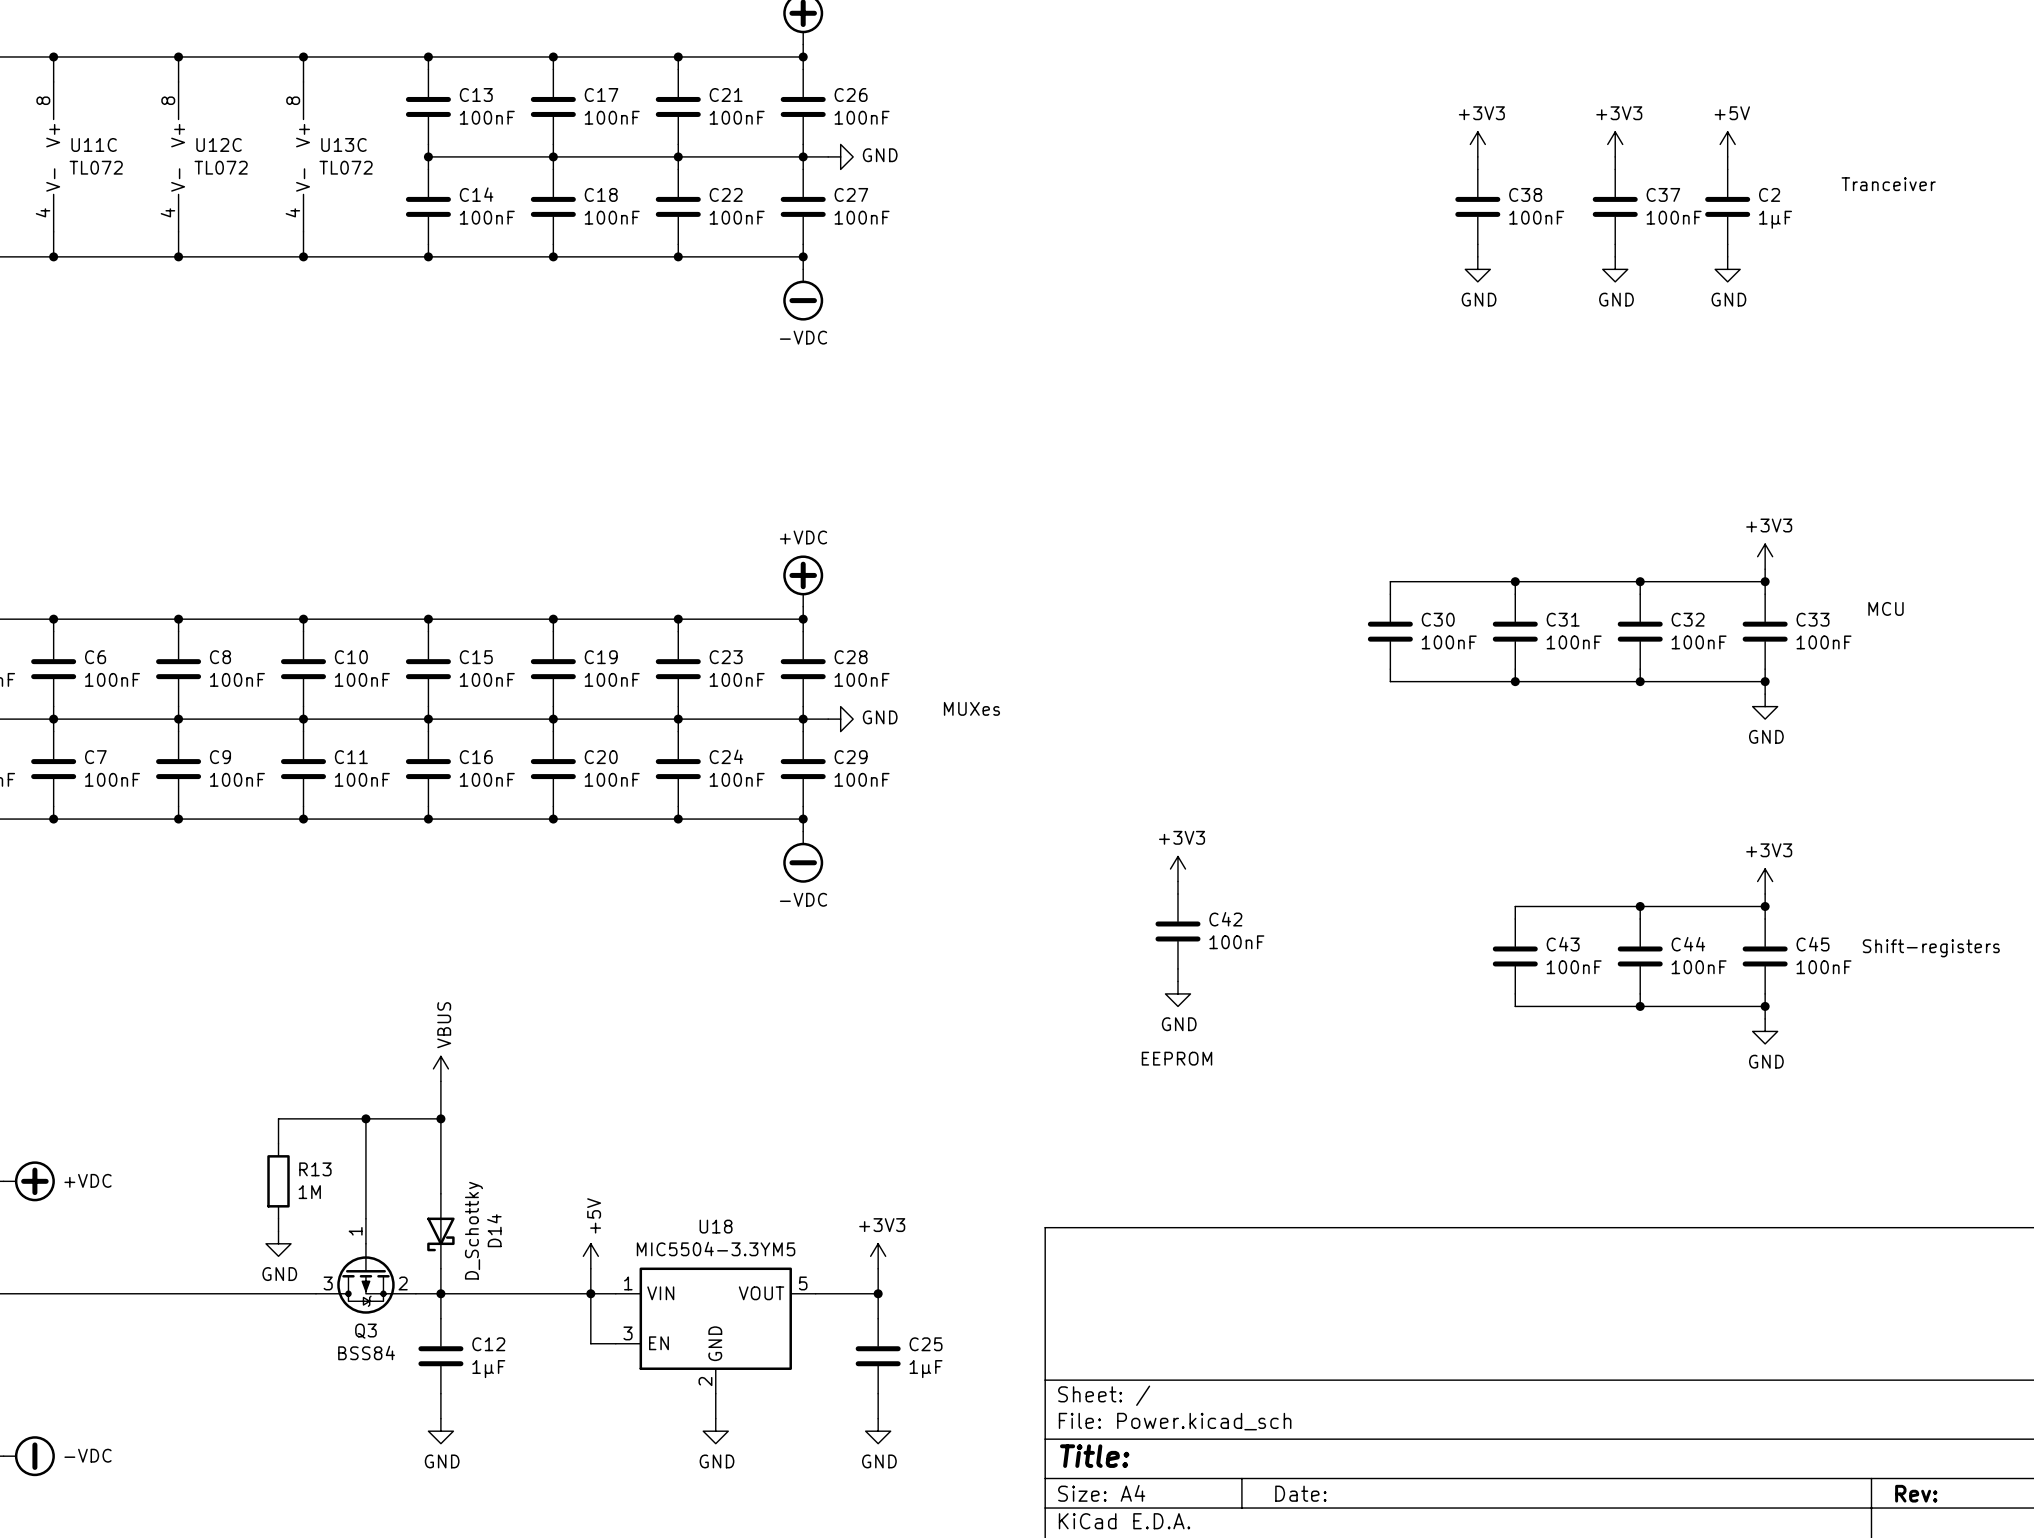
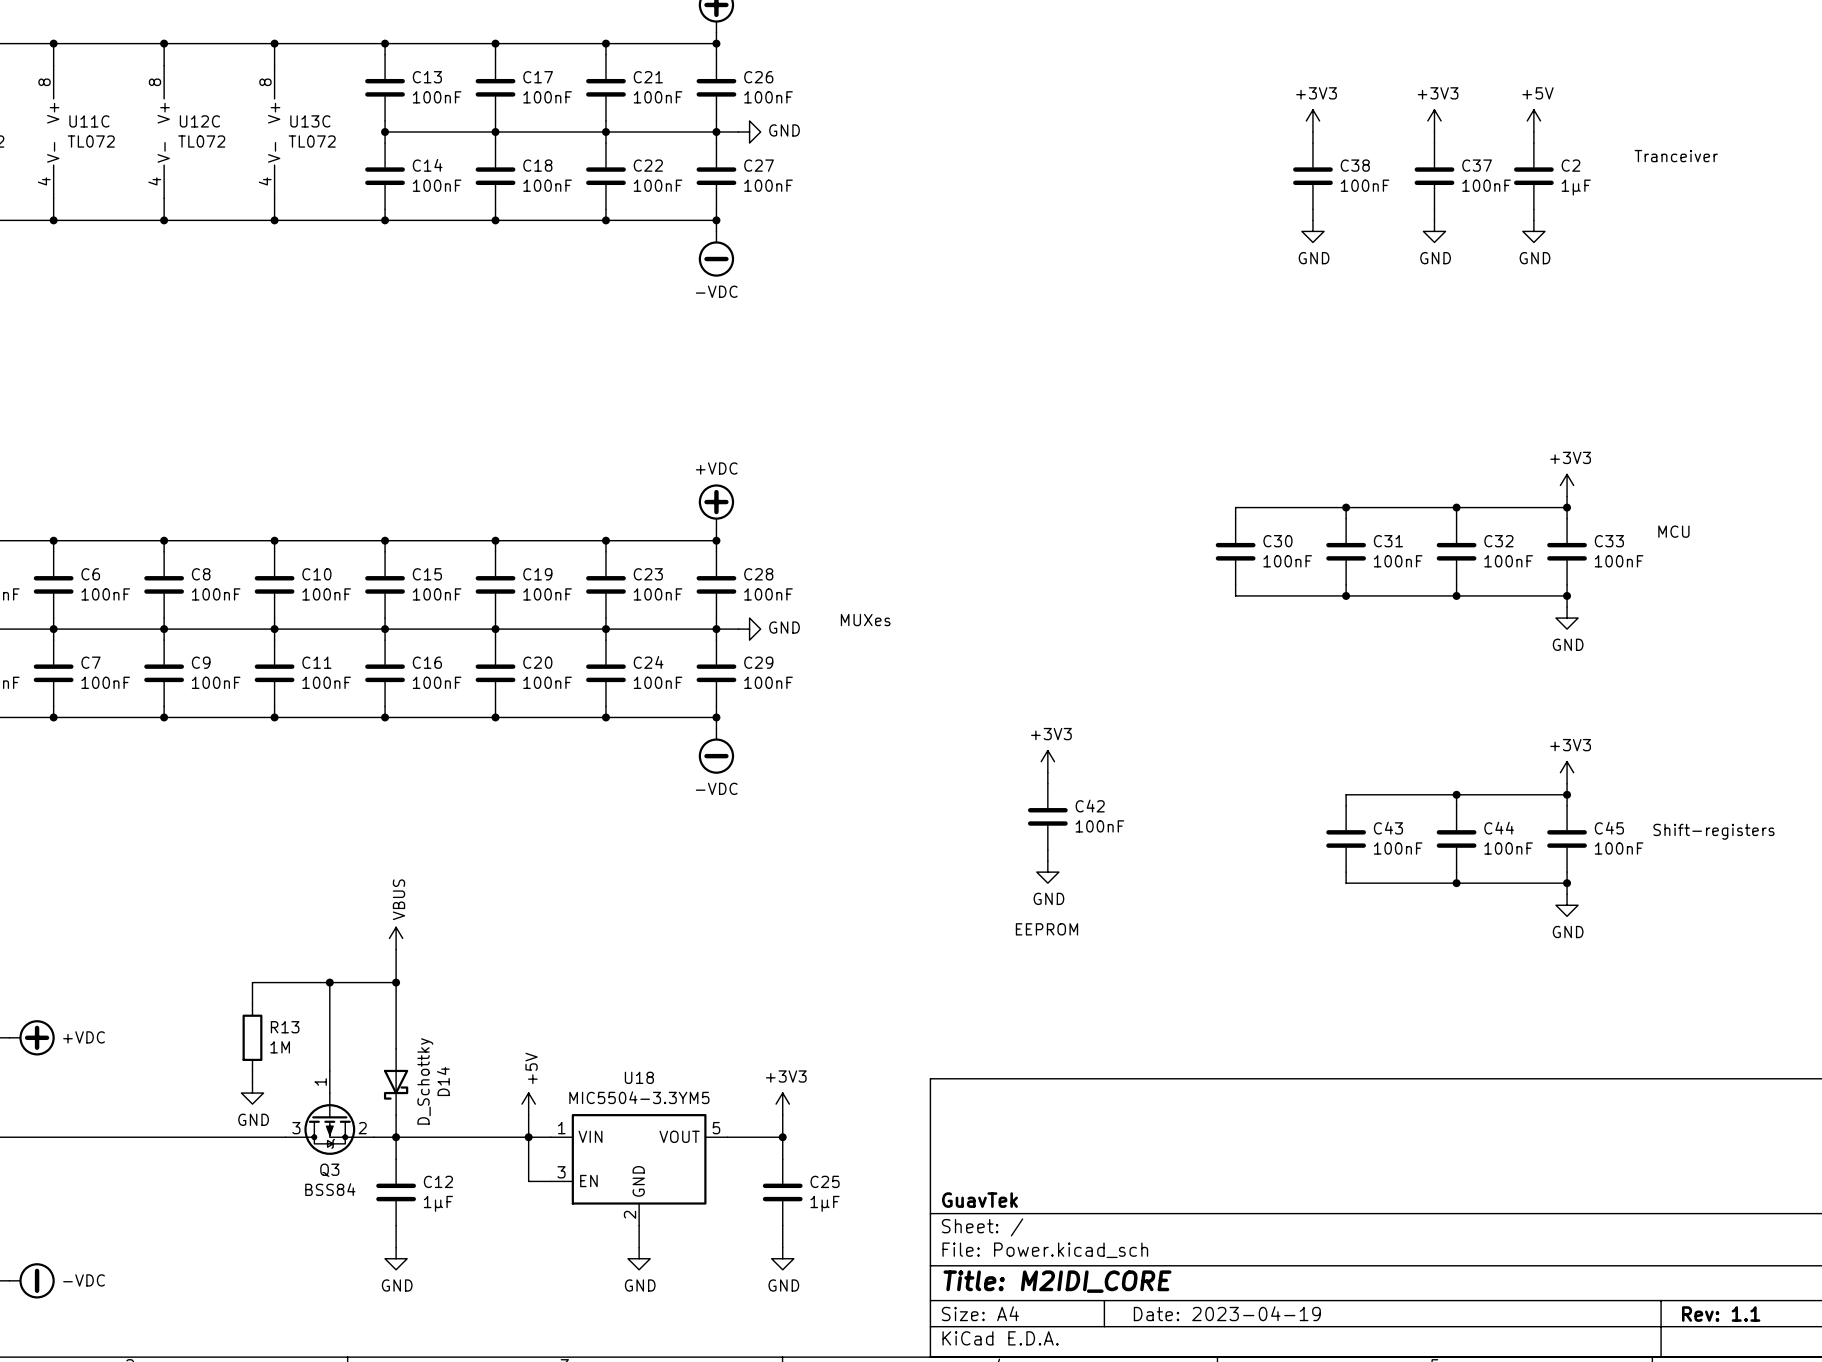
title block: none -> GuavTek (979, 1200)
title block: Title: (1094, 1456) -> Title: M2IDI_CORE (1057, 1281)
title block: Date: (1300, 1493) -> Date: 2023-04-19 (1227, 1313)
title block: Rev: (1916, 1493) -> Rev: 1.1 (1721, 1314)

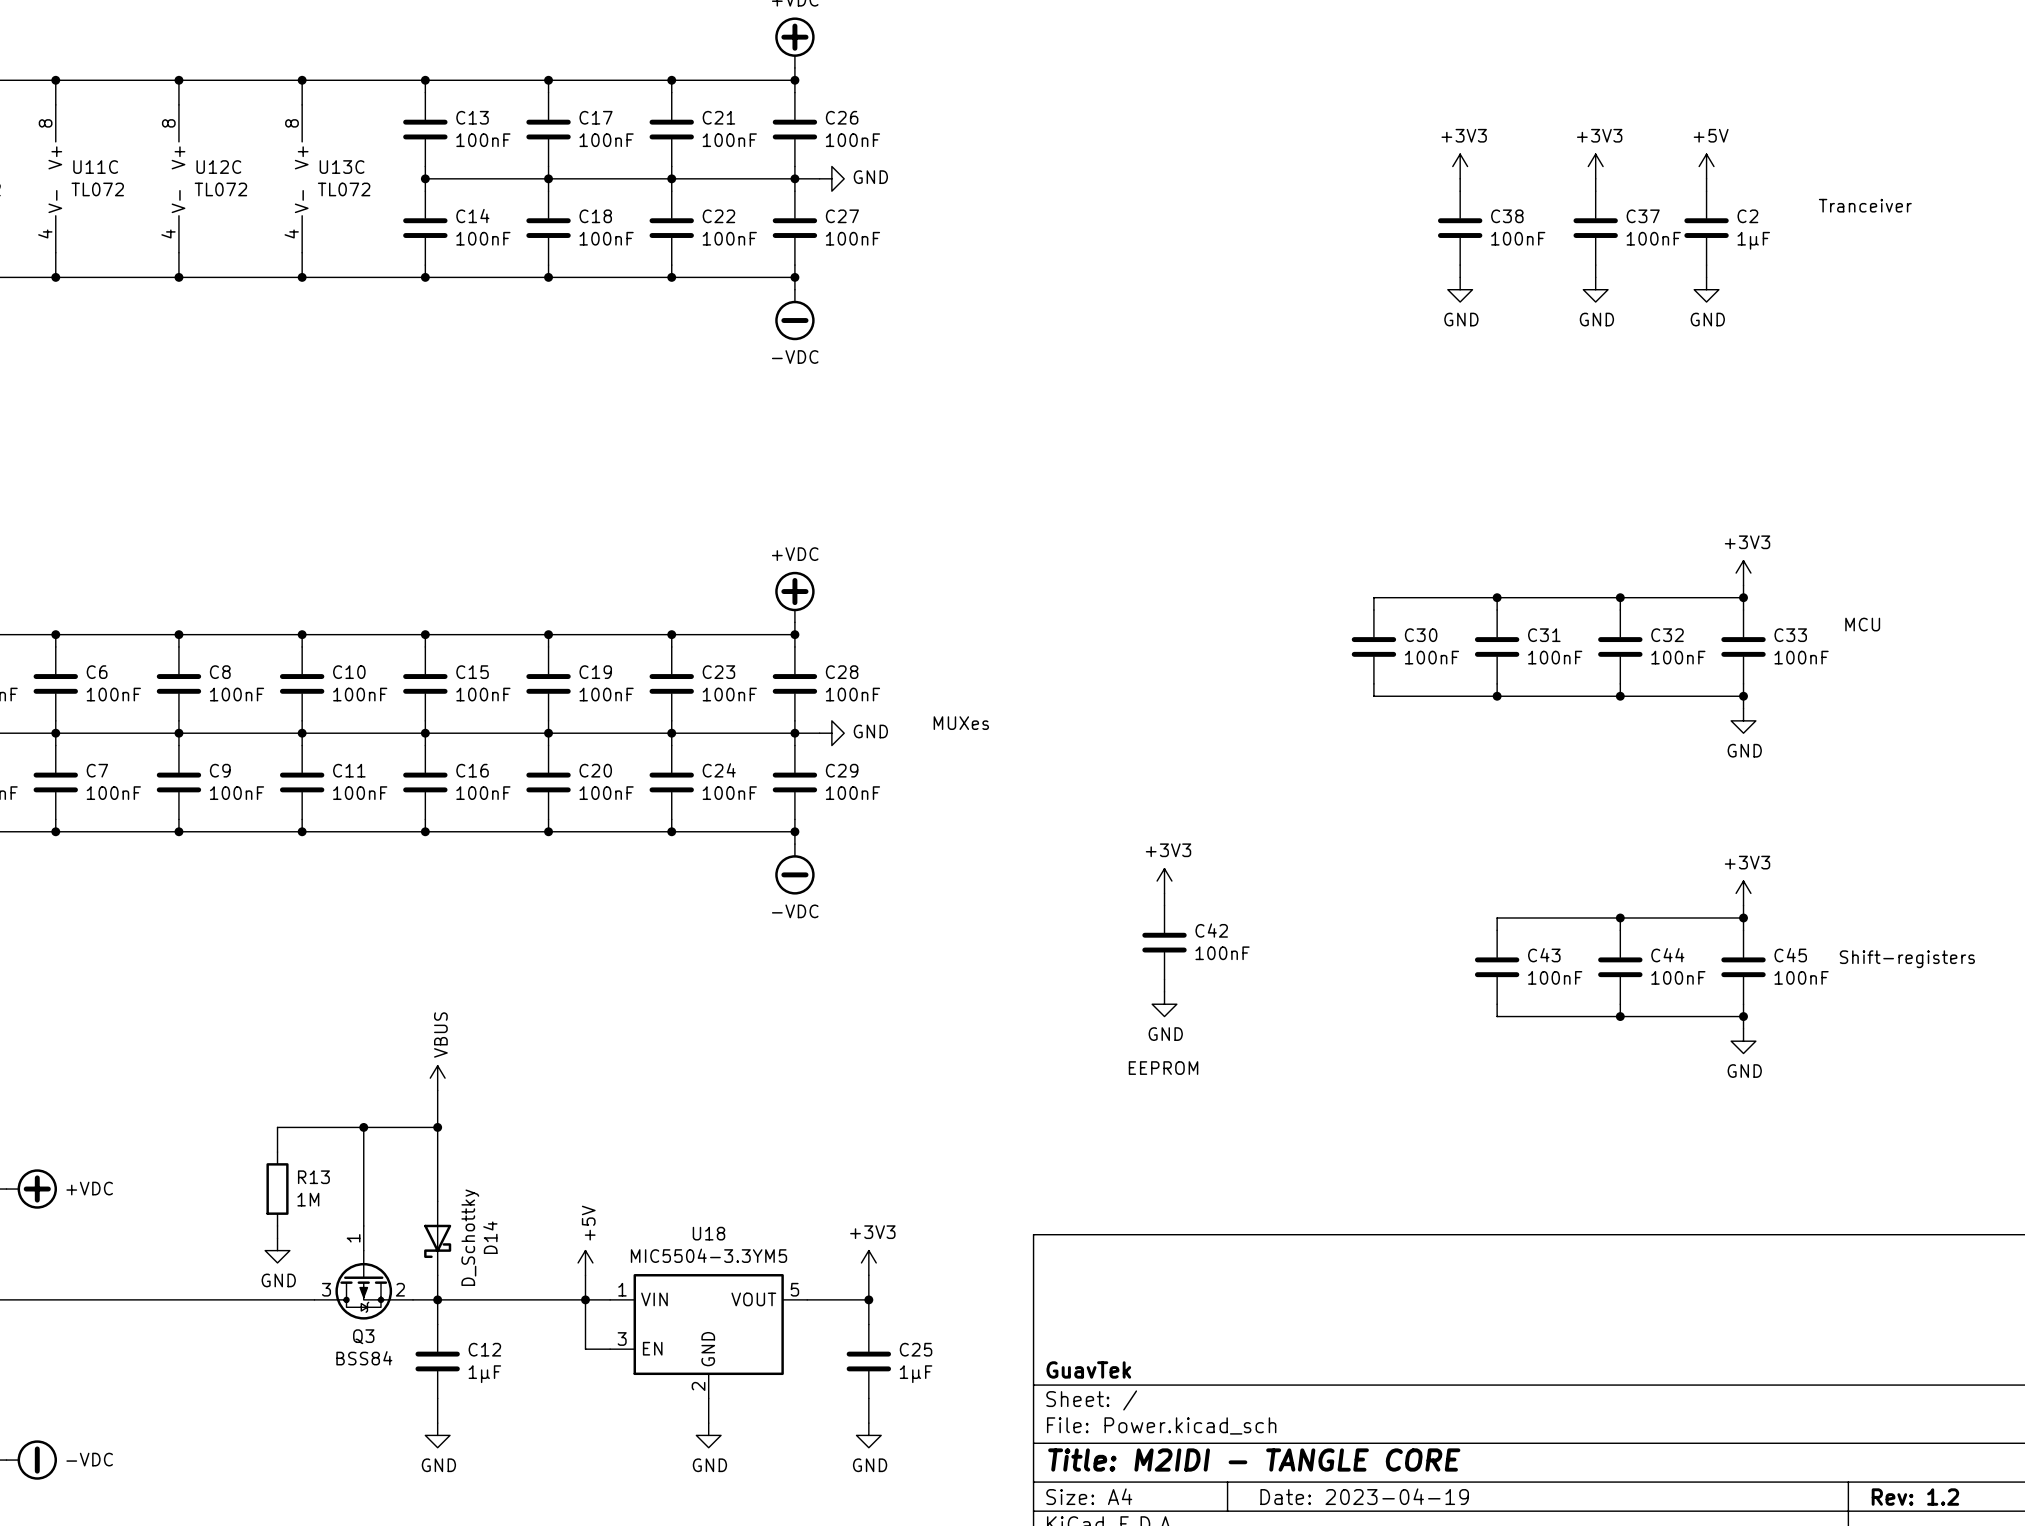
title block: Title: M2IDI_CORE (1057, 1281) -> Title: M2IDI - TANGLE CORE (1254, 1460)
title block: Rev: 1.1 (1721, 1314) -> Rev: 1.2 (1915, 1497)

